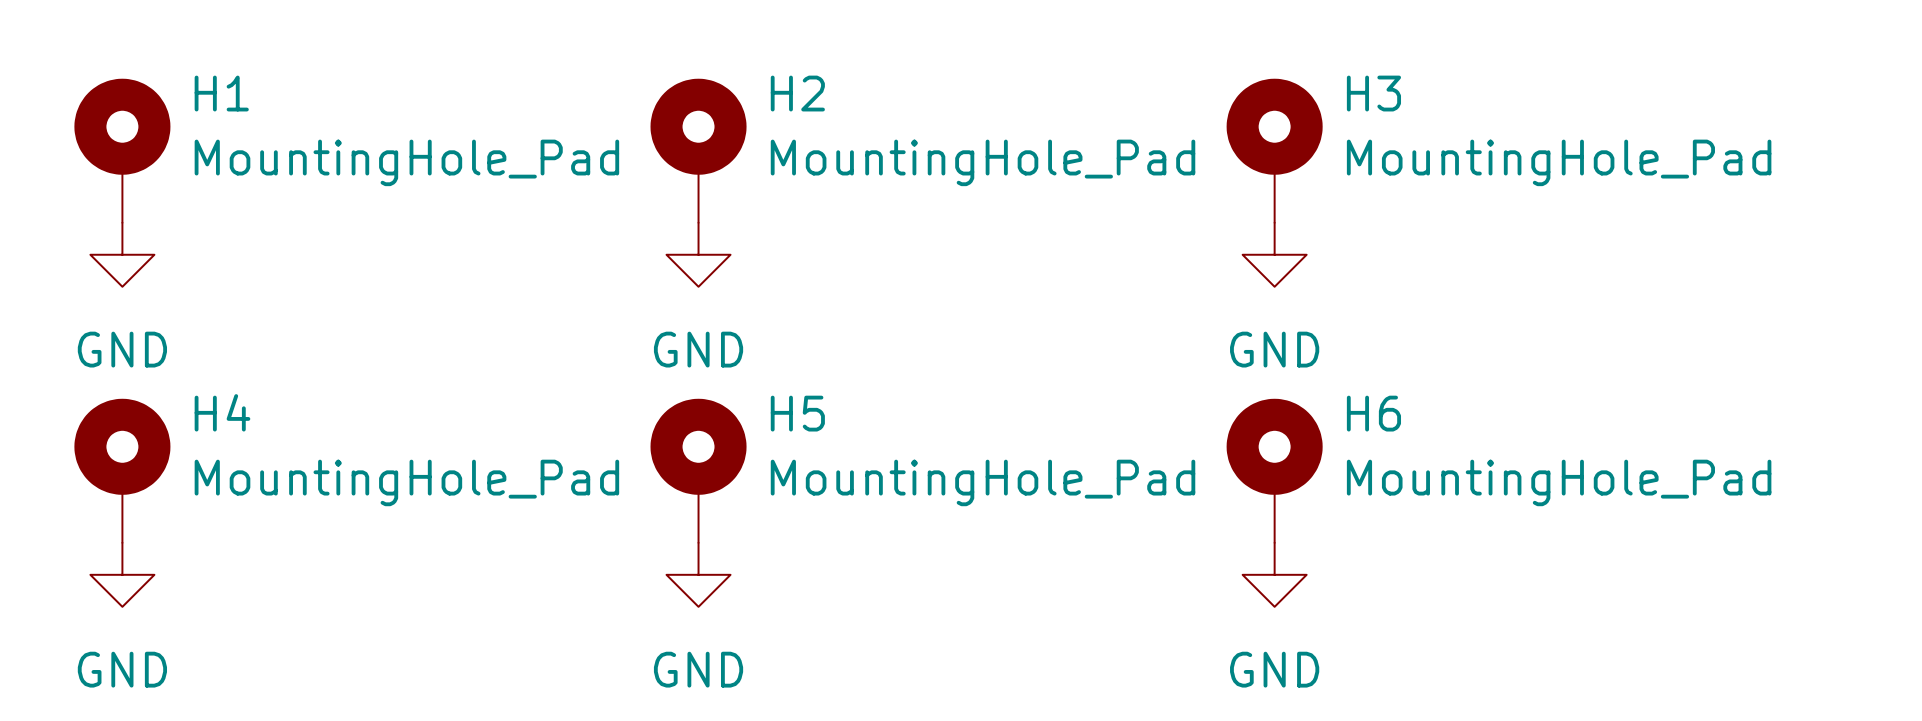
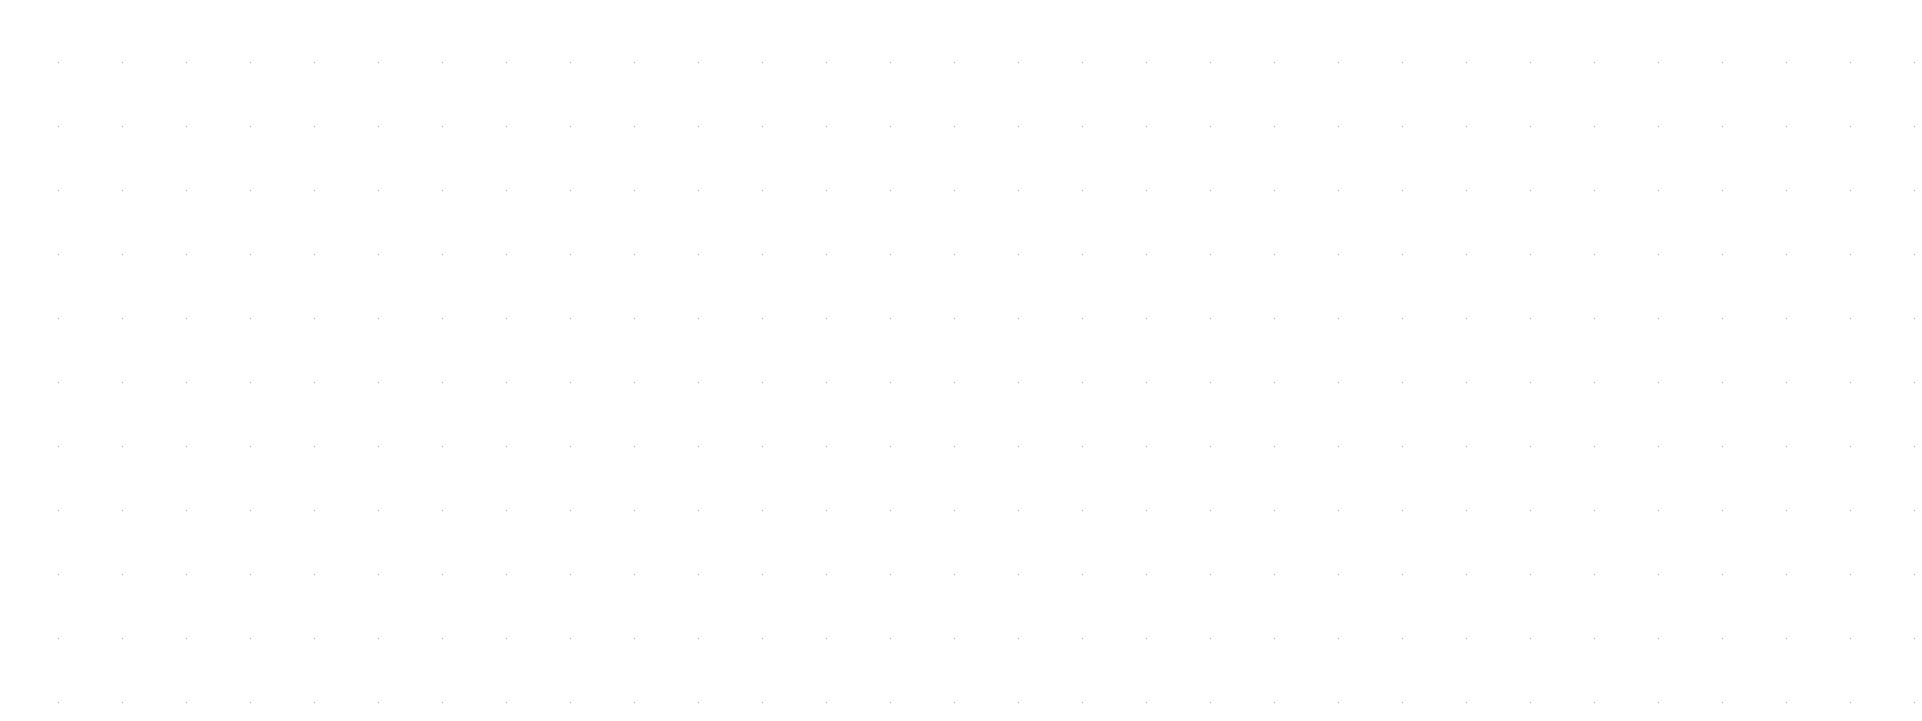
H1: MountingHole_Pad (122, 150) -> none
H2: MountingHole_Pad (698, 150) -> none
H3: MountingHole_Pad (1274, 150) -> none
power symbol: GND (122, 254) -> none
power symbol: GND (698, 254) -> none
power symbol: GND (1274, 254) -> none
H4: MountingHole_Pad (122, 470) -> none
H5: MountingHole_Pad (698, 470) -> none
H6: MountingHole_Pad (1274, 470) -> none
power symbol: GND (122, 574) -> none
power symbol: GND (698, 574) -> none
power symbol: GND (1274, 574) -> none

